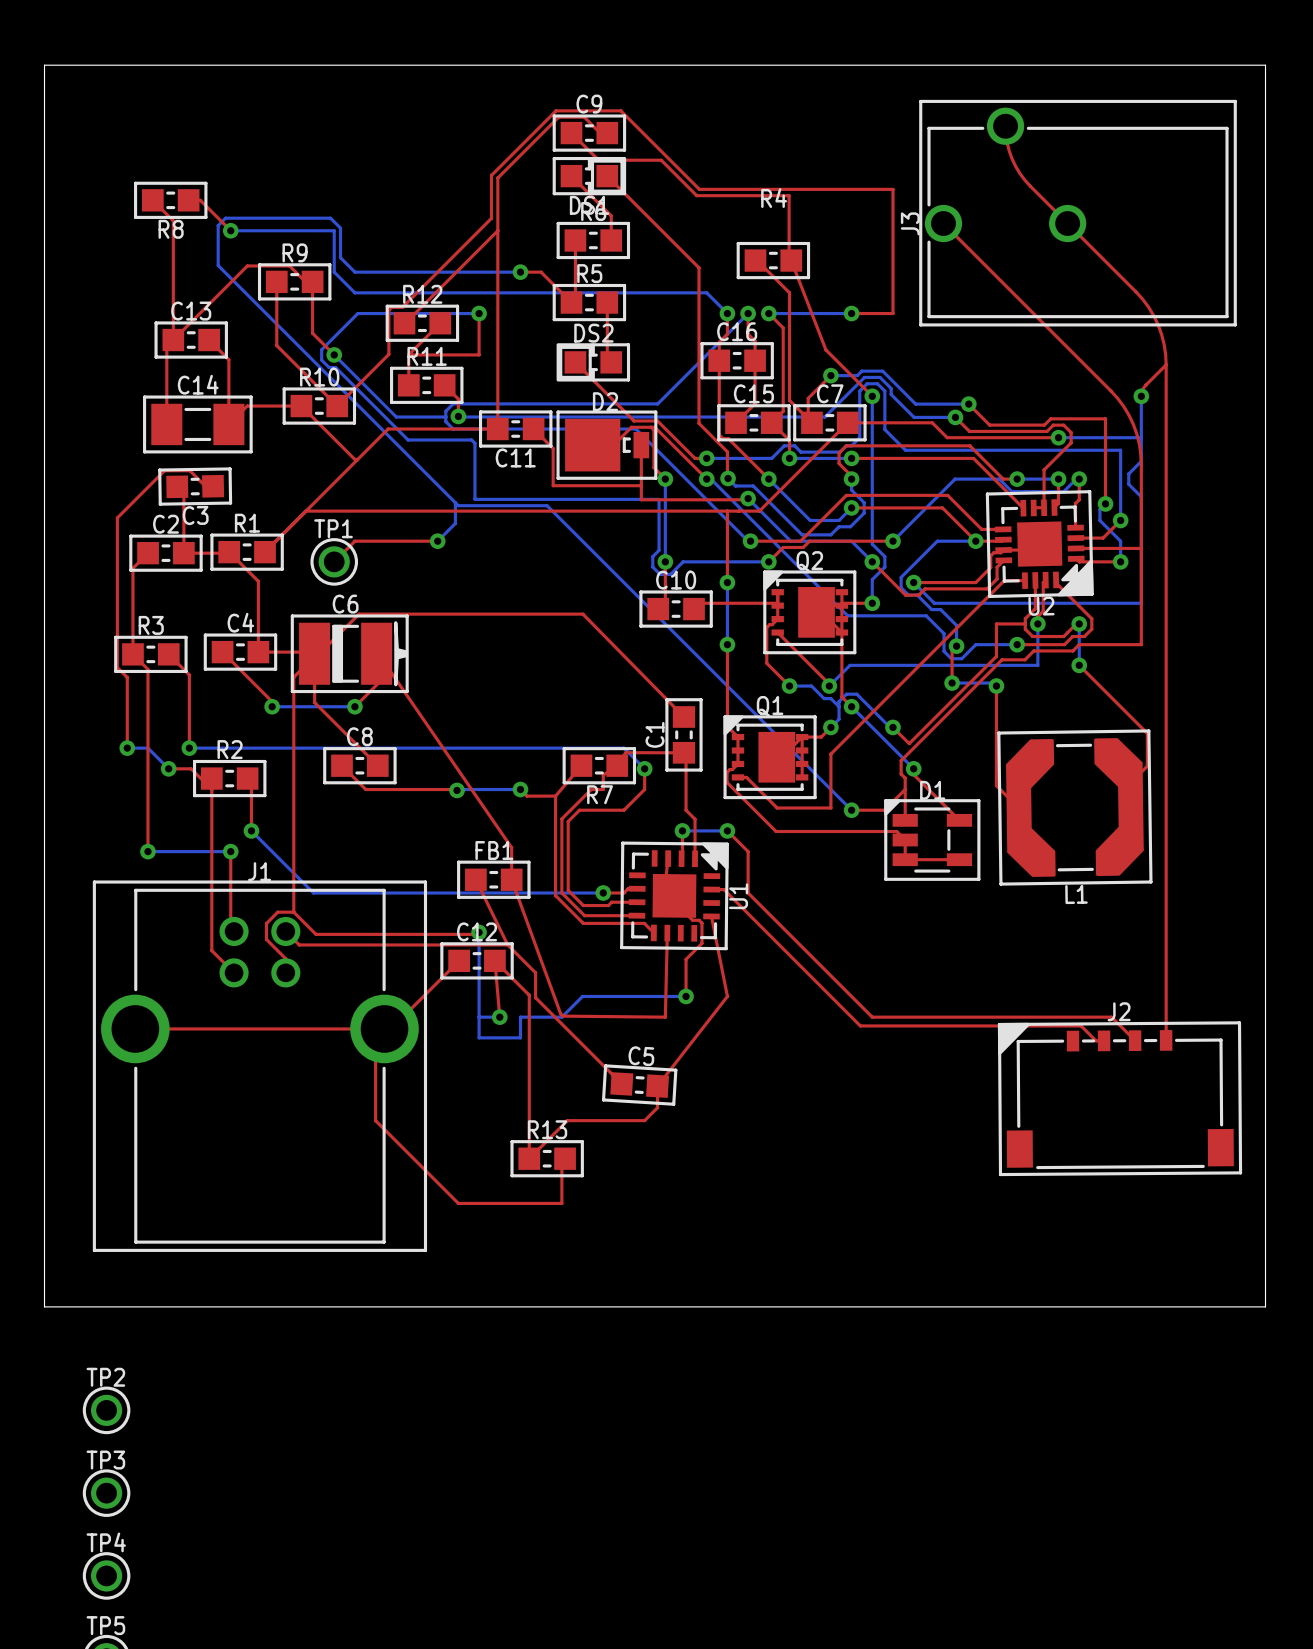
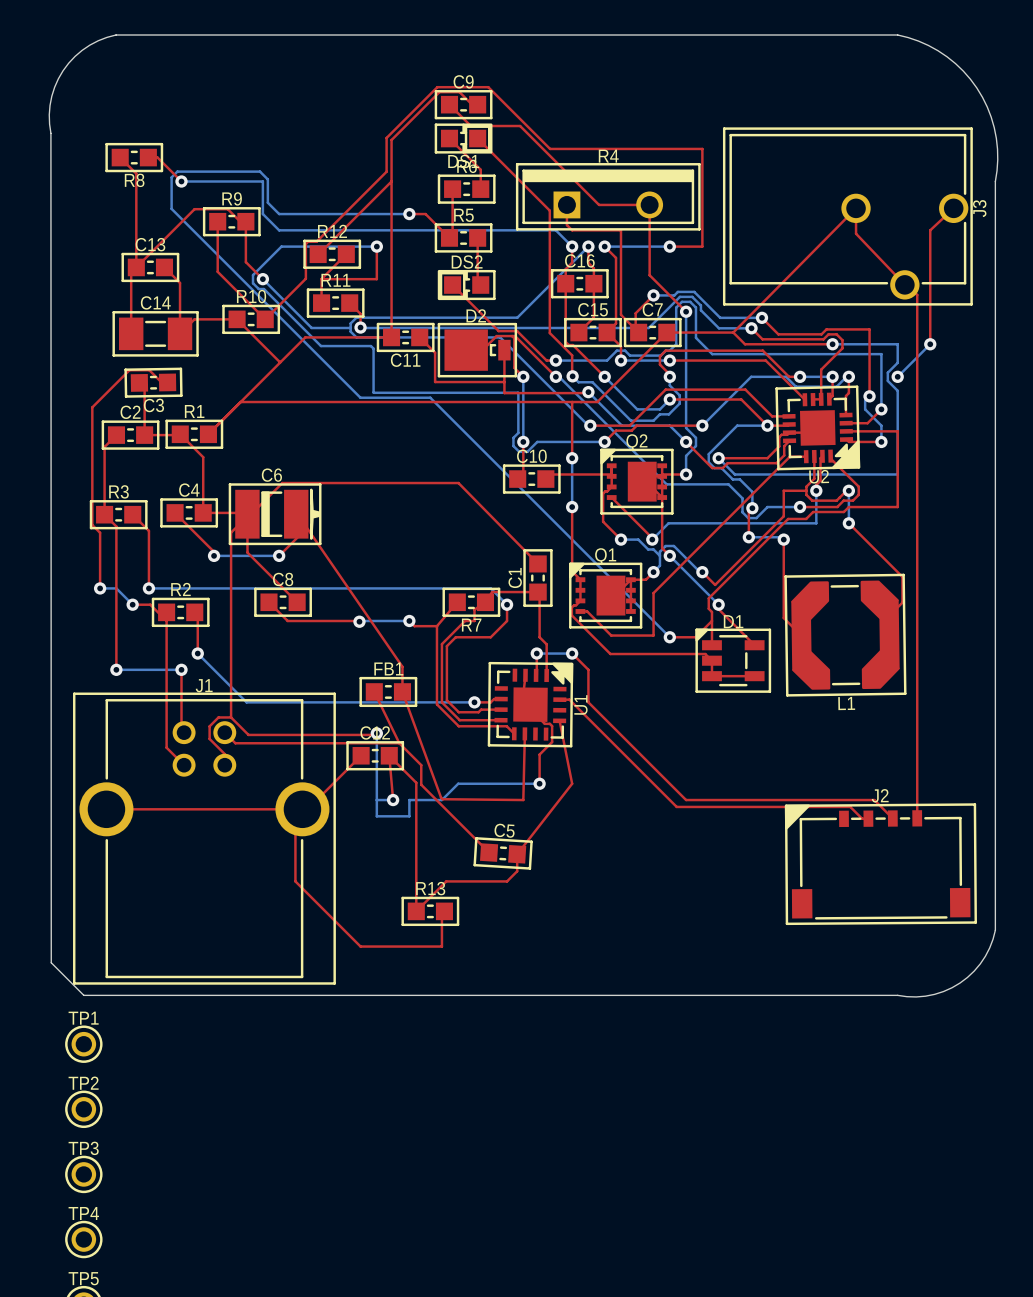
top track: (1005, 126) (1009, 150) (1019, 173) (1067, 223) -> none
top track: (696, 195) (789, 195) (789, 264) (794, 270) -> (548, 153) (599, 204) (649, 204) (649, 275)
J3 rotation: 0° (1078, 213) -> 180° (847, 216)
top track: (943, 223) (1111, 391) (1123, 406) (1136, 434) (1140, 454) (1141, 548) -> none
board edge: (1265, 230) (1265, 65) (44, 65) (44, 1306) (1265, 1306) (1265, 1182) -> (995, 181) (997, 159) (996, 138) (991, 117) (976, 88) (963, 71) (937, 50) (918, 41) (897, 35) (116, 35) (89, 45) (68, 63) (54, 87) (49, 114) (50, 133) (51, 962) (83, 995) (897, 995) (916, 996) (943, 991) (967, 977) (985, 956) (995, 930)
top track: (1077, 232) (1135, 291) (1148, 307) (1161, 334) (1166, 364) -> none
R4 footprint: [736, 241, 811, 280] -> [515, 163, 701, 231]
top track: (755, 260) (789, 292) -> (566, 204) (566, 225) (572, 230) (620, 230)
top track: (791, 260) (825, 349) -> none
top track: none -> (953, 208) (930, 230) (930, 344)
top track: (1166, 364) (1166, 374) -> (733, 332) (856, 208) (856, 233) (904, 284) (917, 294)
top track: (1166, 364) (1144, 386) (1141, 396) -> none
bottom track: (1141, 396) (1141, 437) -> none
via: (1141, 396) -> none
bottom track: none -> (930, 344) (897, 376)
via: none -> (930, 344)
via: none -> (897, 376)
bottom track: (455, 502) (455, 523) (437, 541) -> none
top track: (437, 541) (354, 541) (334, 561) -> none
via: (437, 541) -> none
TP1 position: (334, 561) -> (83, 1044)

